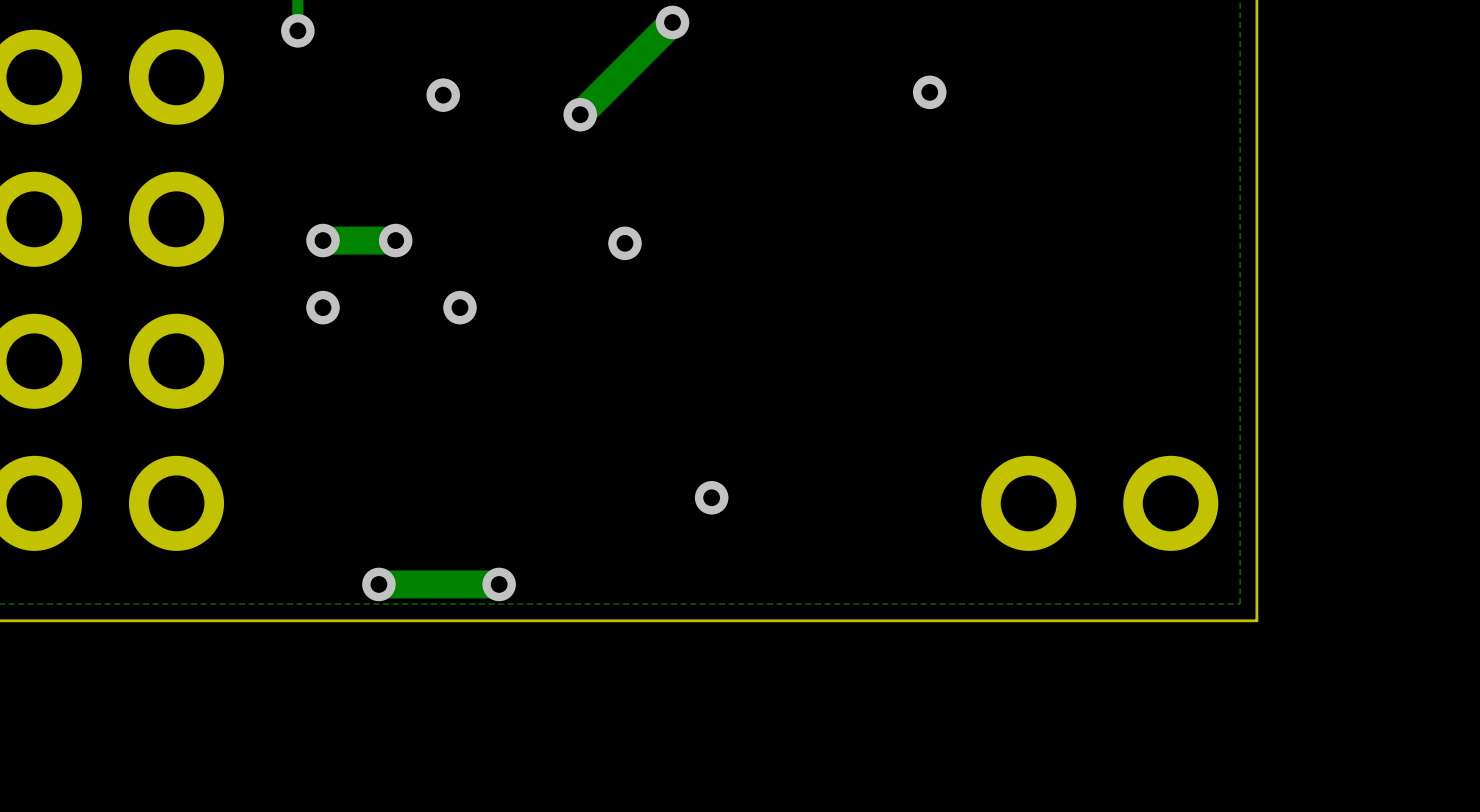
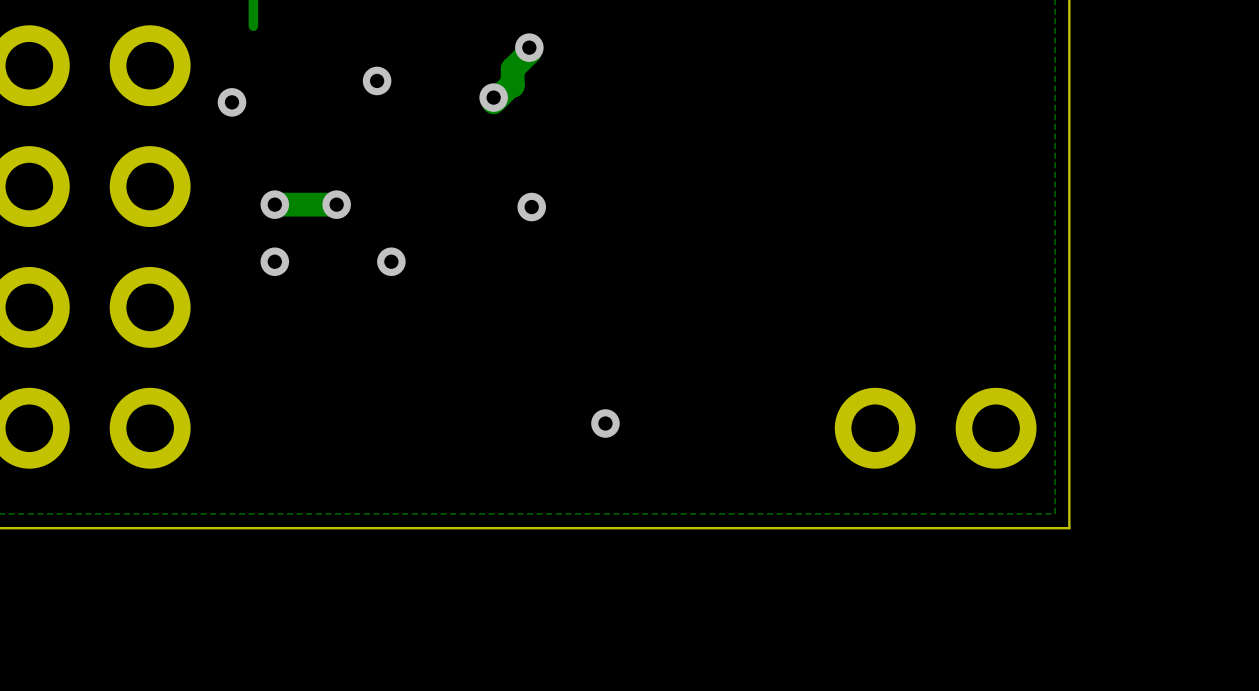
track: (672, 22) (580, 114) -> none
via position: (672, 22) -> (529, 47)
via: (297, 30) -> none
track: none -> (529, 47) (529, 52) (512, 69) (512, 85) (510, 85) (493, 102)
via: (929, 92) -> none
via: none -> (231, 102)
via: (378, 584) -> none
track: (499, 584) (378, 584) -> none
via: (499, 584) -> none

